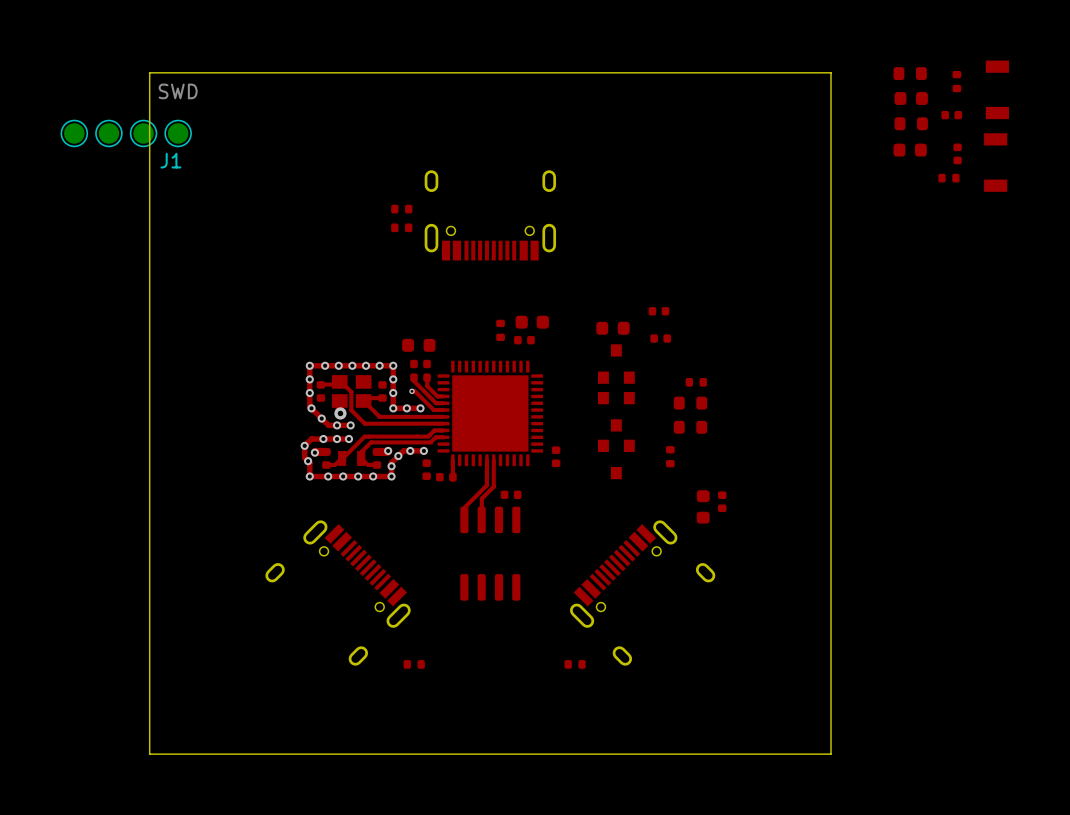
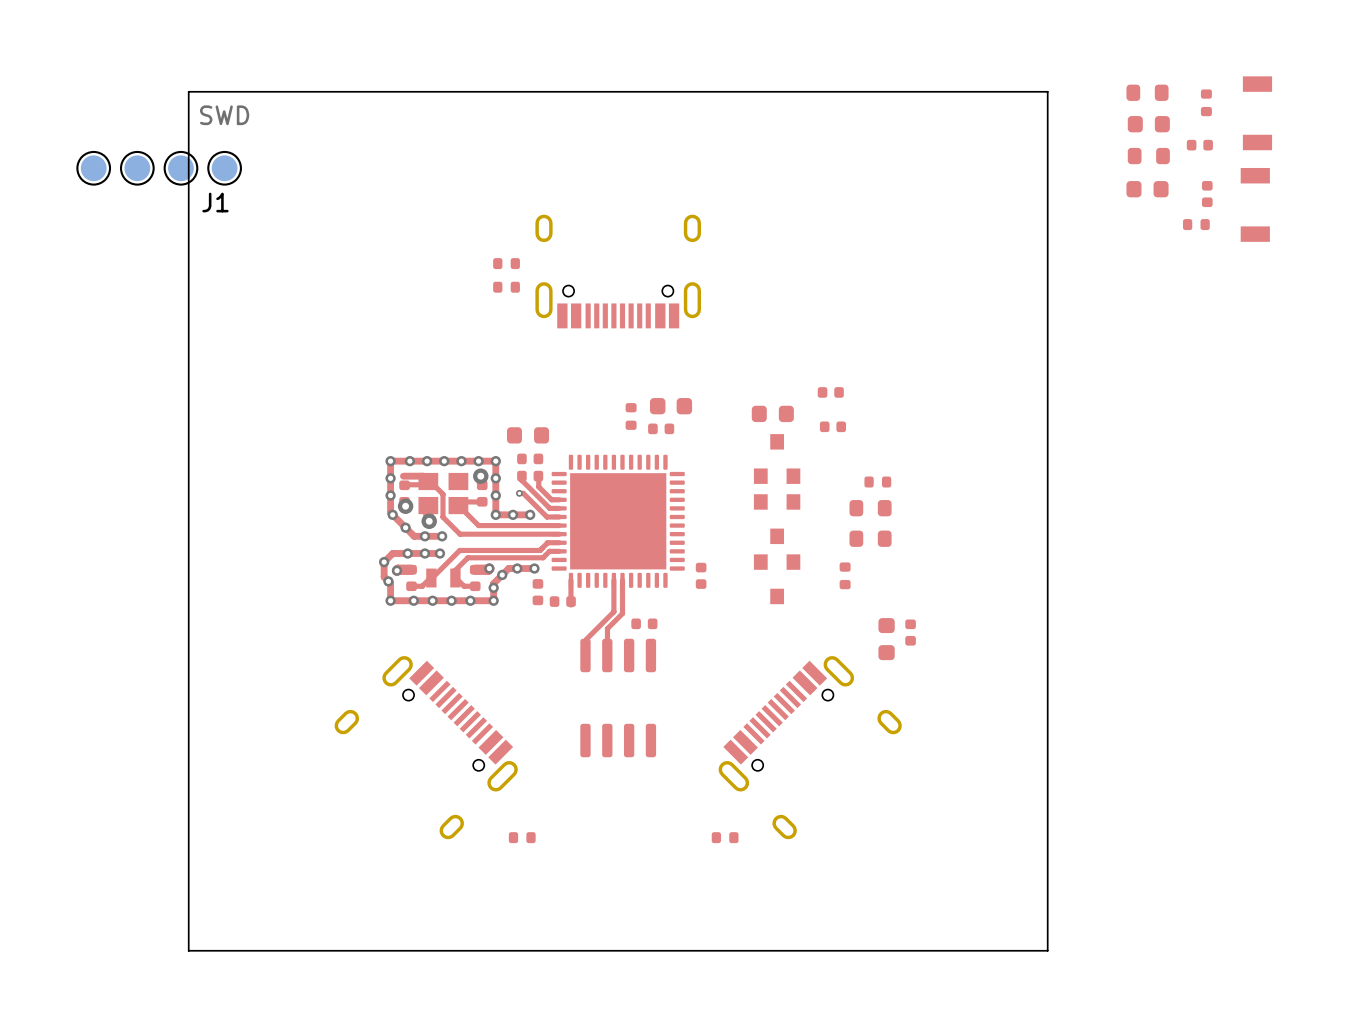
top track: none -> (403, 476) (423, 476) (428, 481)
via: none -> (480, 476)
via: none -> (405, 506)

